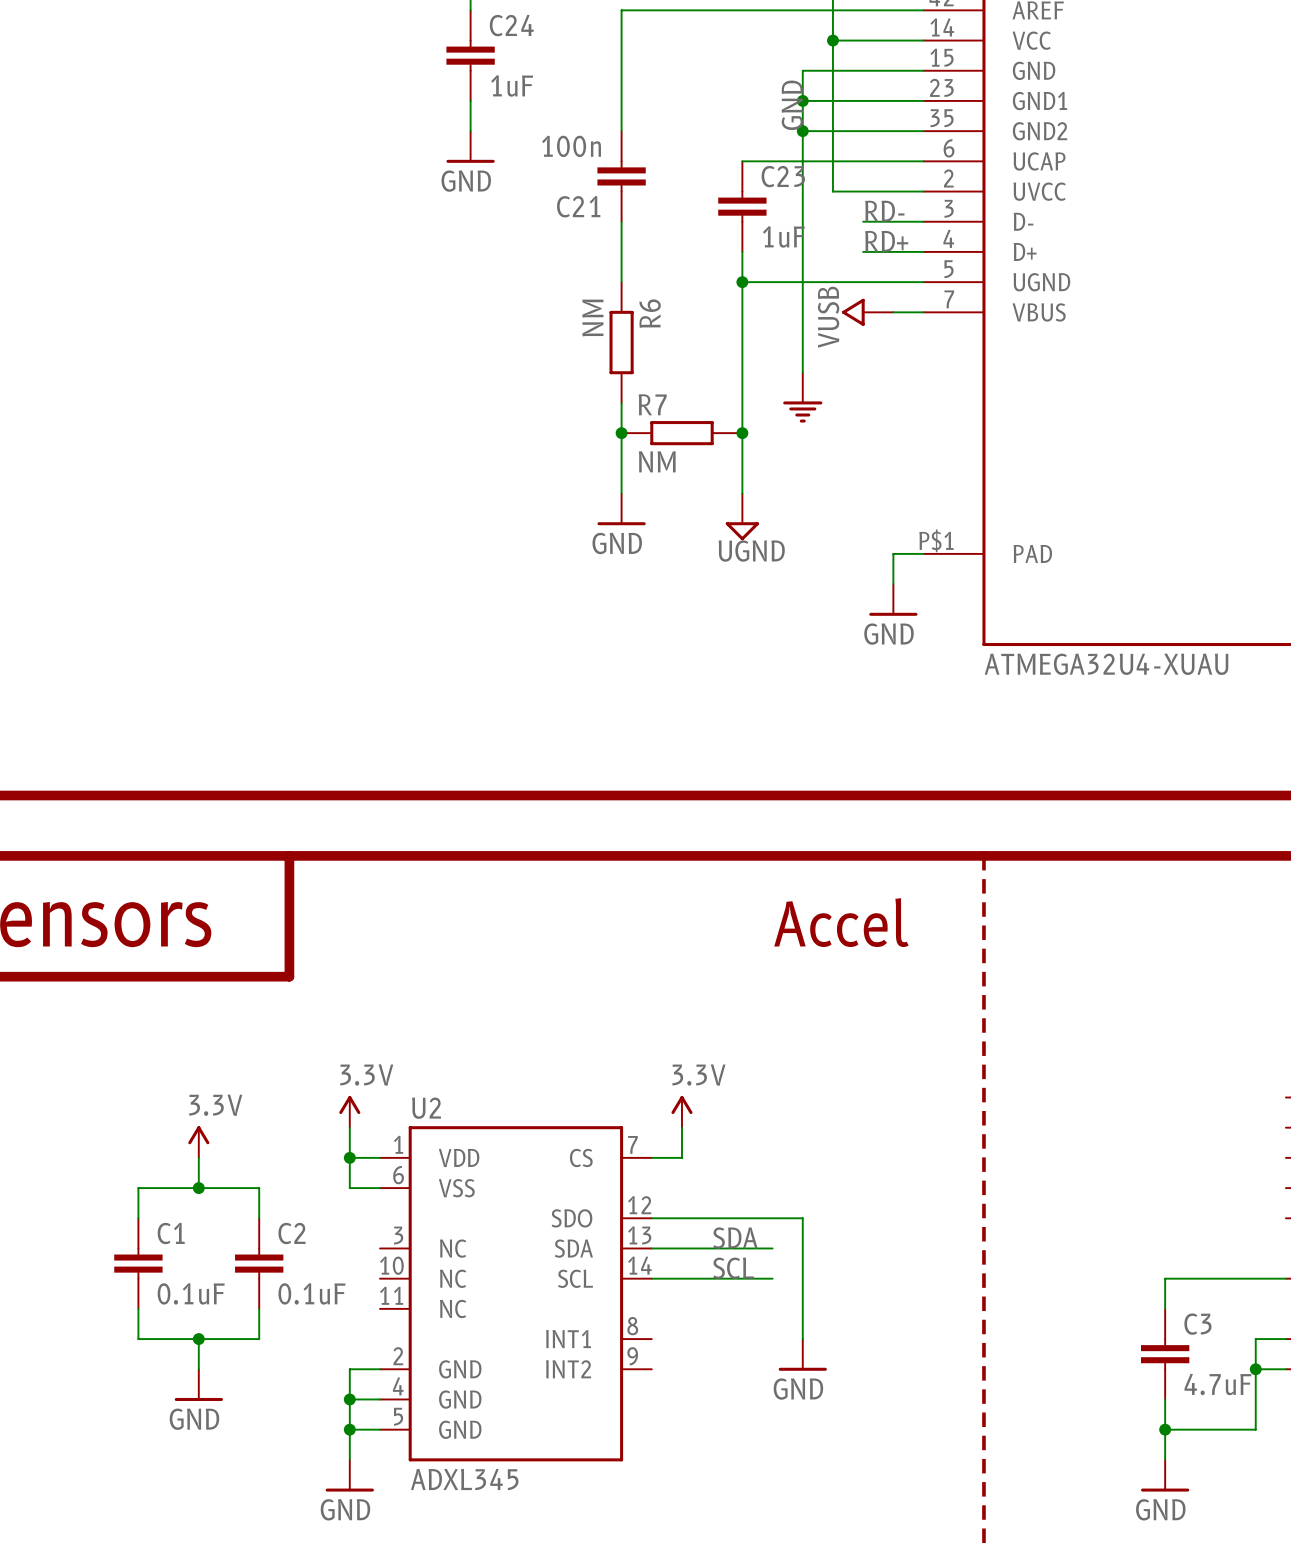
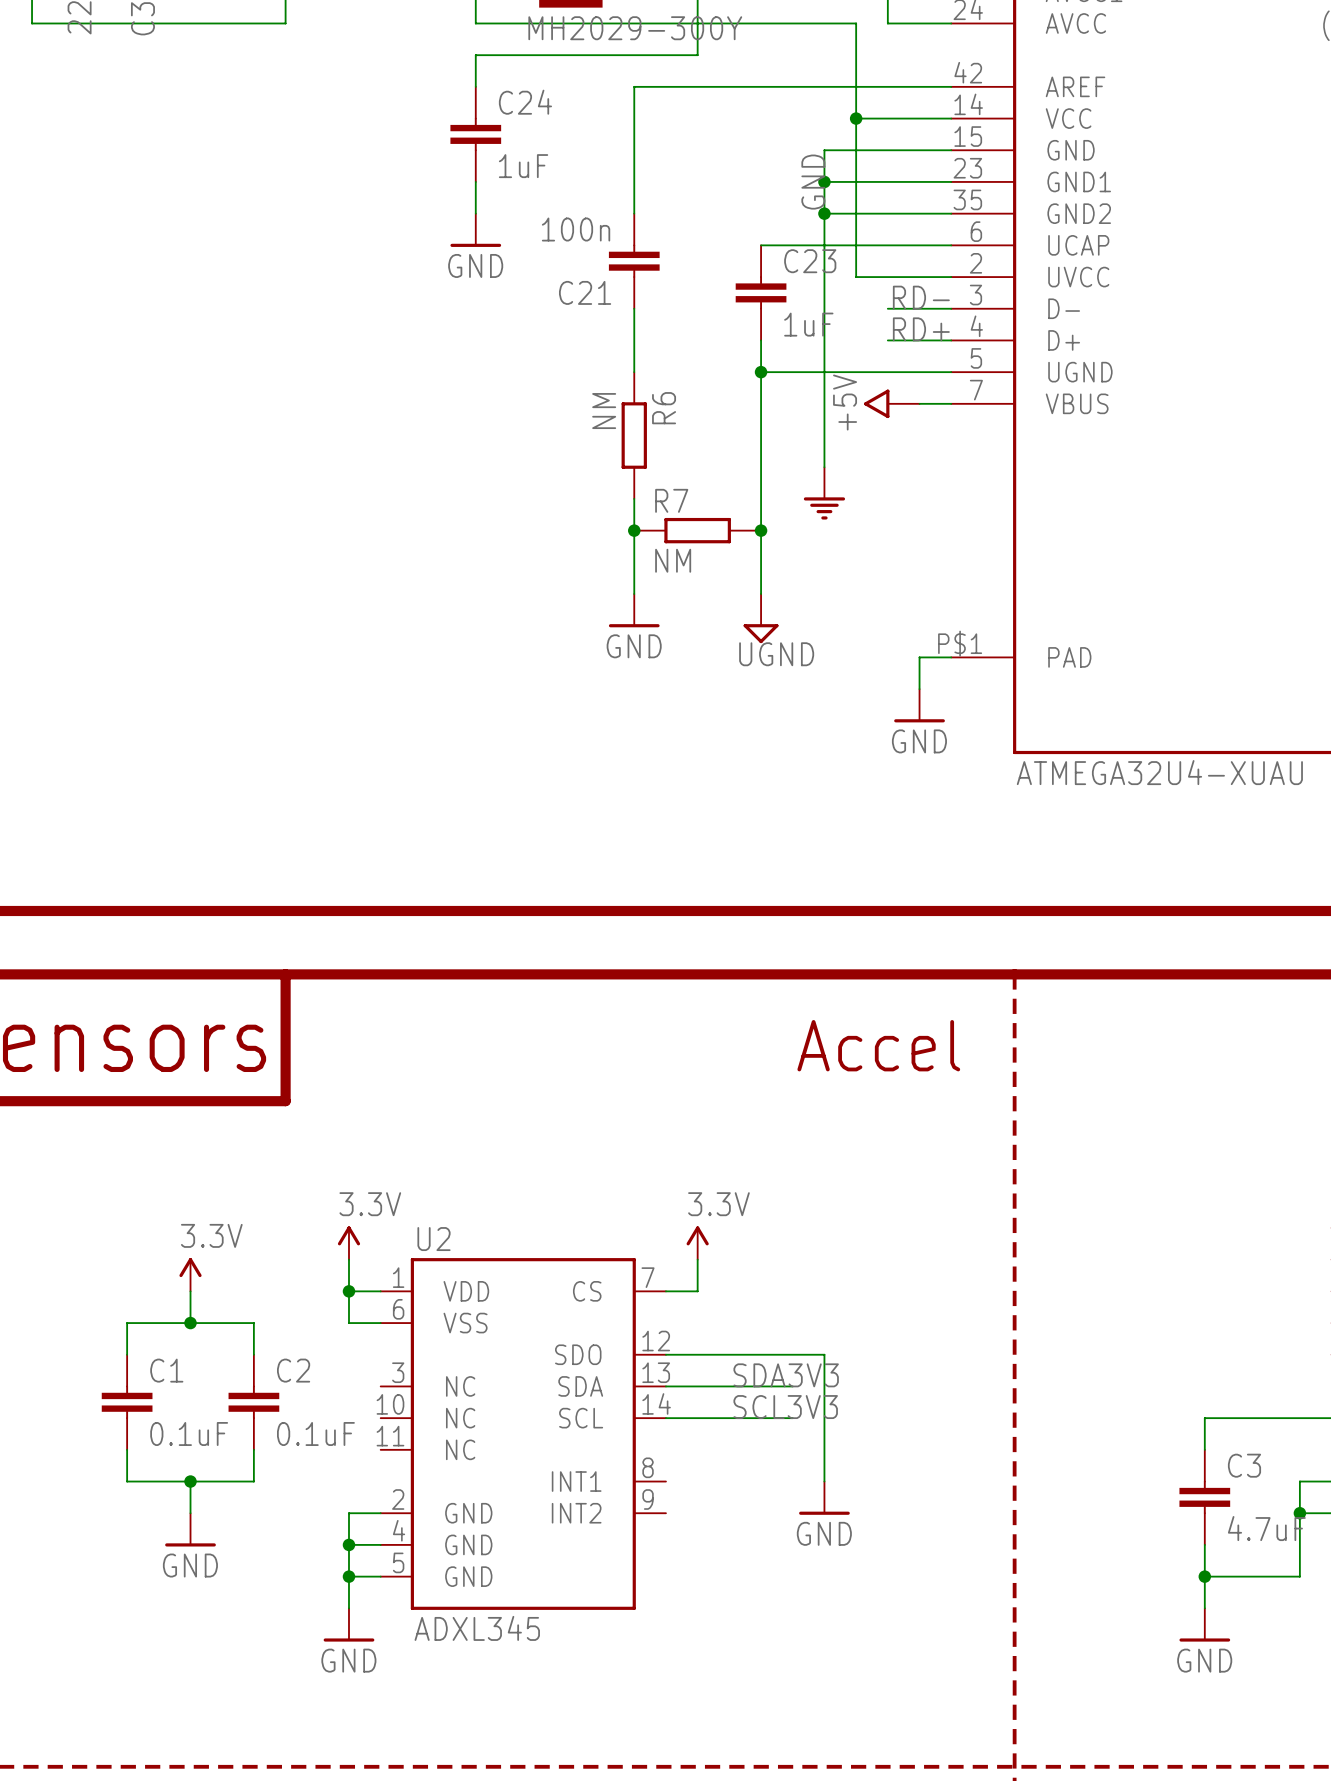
power symbol: VUSB (867, 312) -> +5V (891, 403)
label: SDA (735, 1238) -> SDA3V3 (786, 1375)
label: SCL (733, 1268) -> SCL3V3 (785, 1407)

